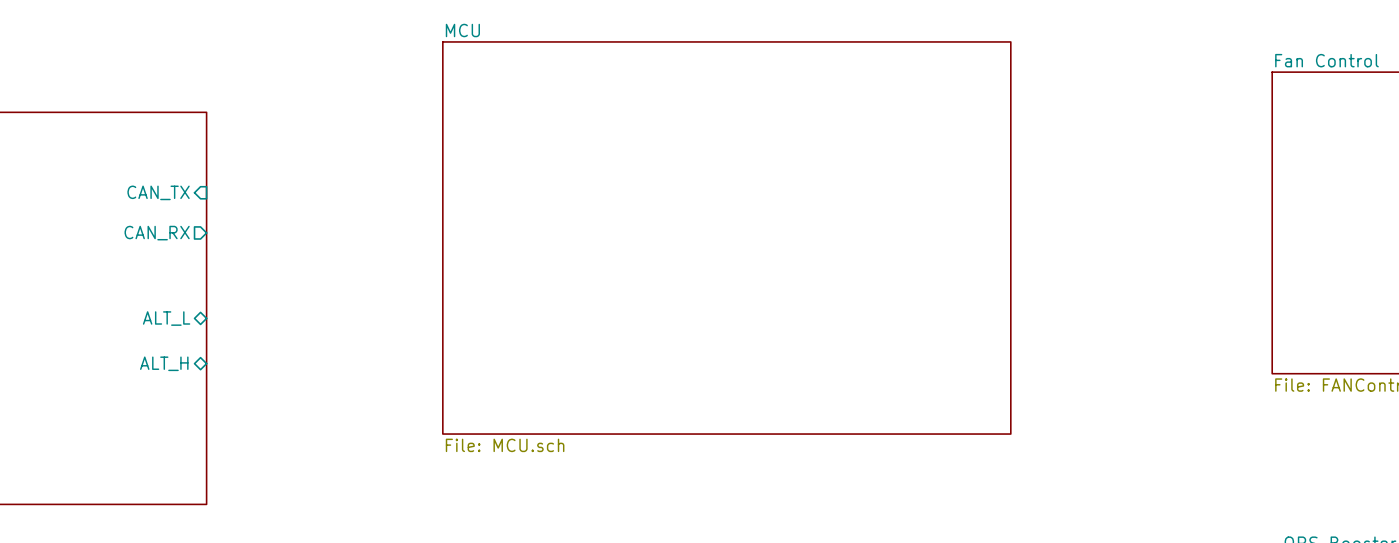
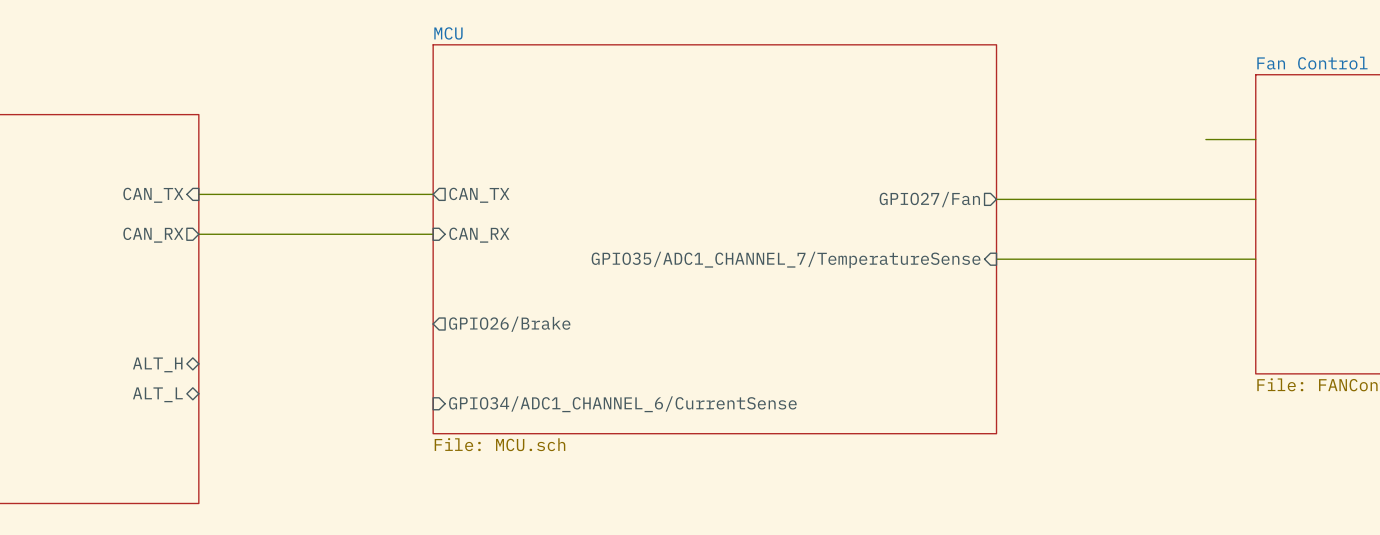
wire: none -> (1205, 139) (1255, 139)
wire: none -> (198, 194) (433, 194)
sheet pin: none -> CAN_TX (479, 195)
wire: none -> (996, 199) (1255, 199)
sheet pin: none -> GPIO27/Fan (929, 199)
wire: none -> (198, 234) (433, 234)
sheet pin: none -> CAN_RX (479, 235)
wire: none -> (996, 259) (1255, 259)
sheet pin: none -> GPIO35/ADC1_CHANNEL_7/TemperatureSense (786, 259)
sheet pin position: ALT_L (166, 318) -> ALT_L (157, 394)
sheet pin: none -> GPIO26/Brake (509, 324)
sheet pin: none -> GPIO34/ADC1_CHANNEL_6/CurrentSense (622, 404)

